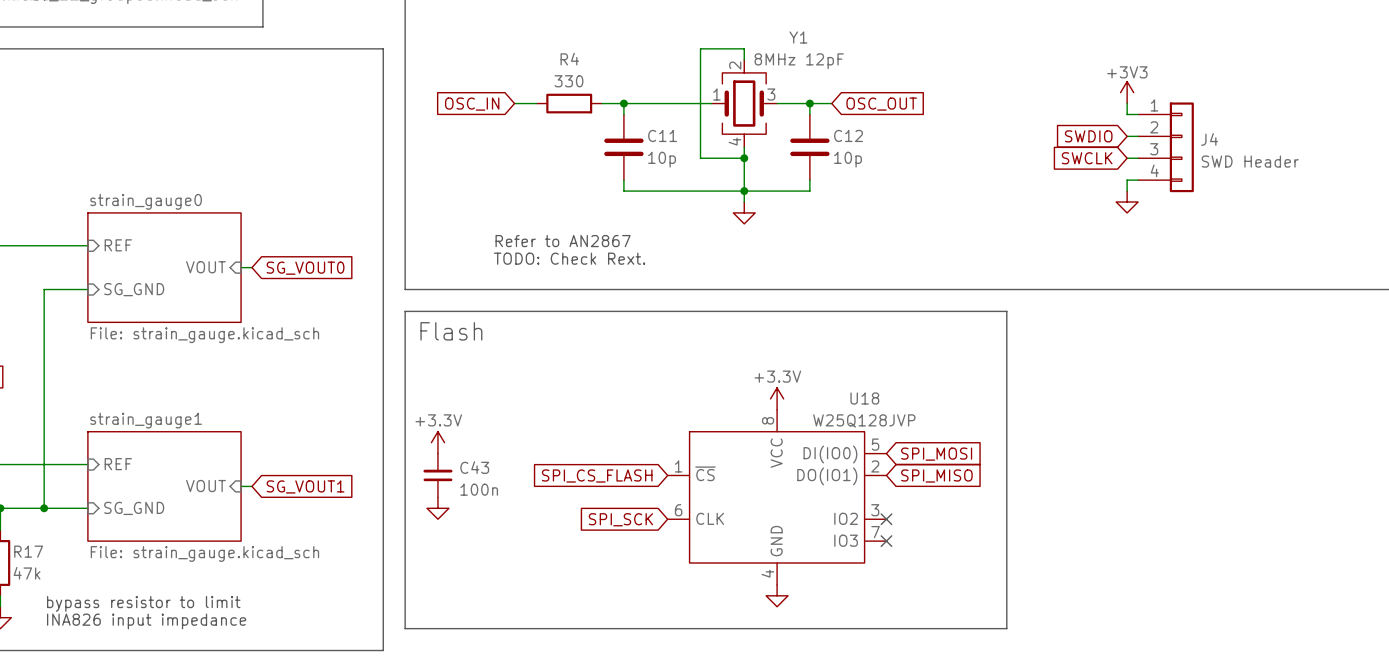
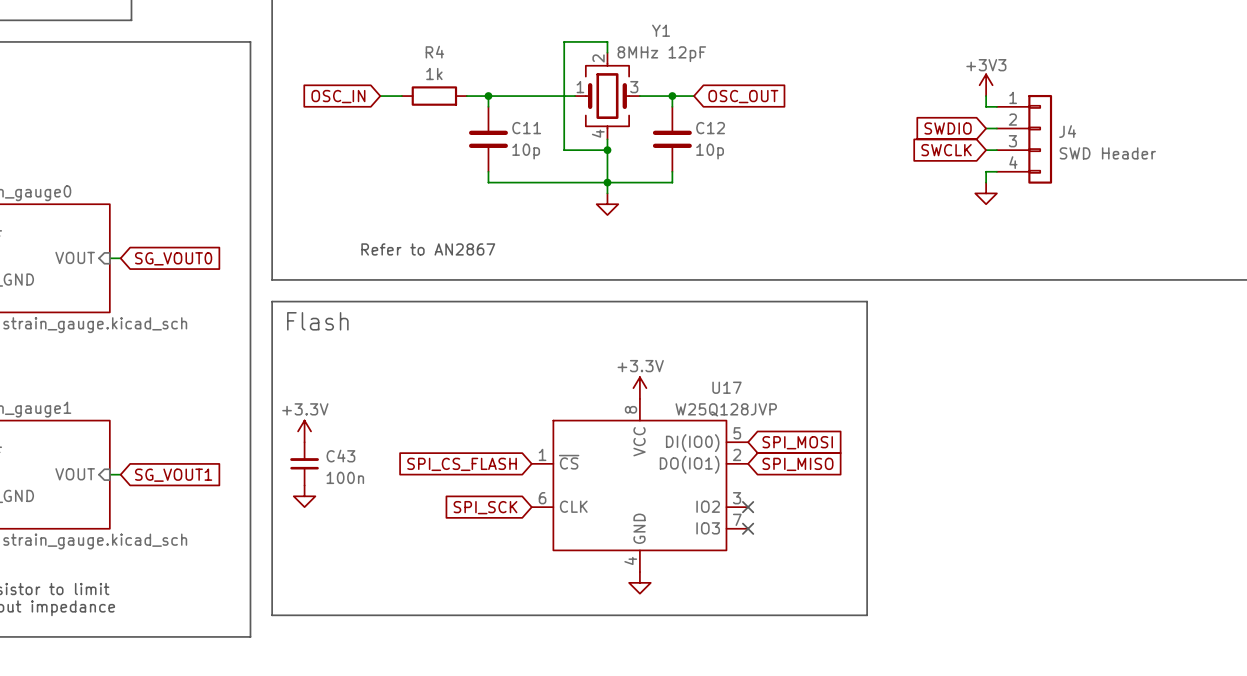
R4 value: 330 (568, 81) -> 1k (434, 74)
text: Refer to AN2867 (563, 241) -> none
text: TODO: Check Rext. (569, 258) -> Refer to AN2867 (428, 249)
U18 name: U18 (864, 398) -> U17 (726, 387)

